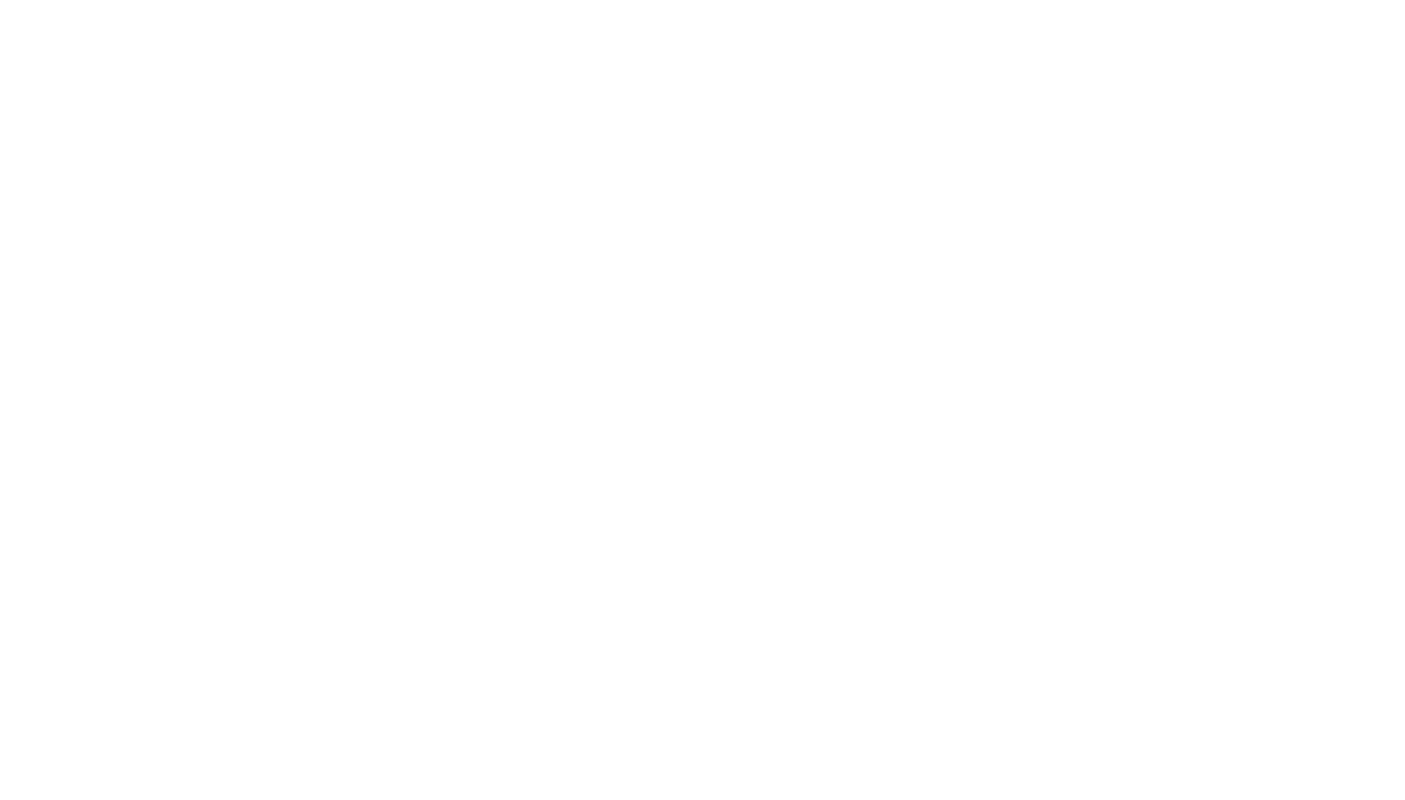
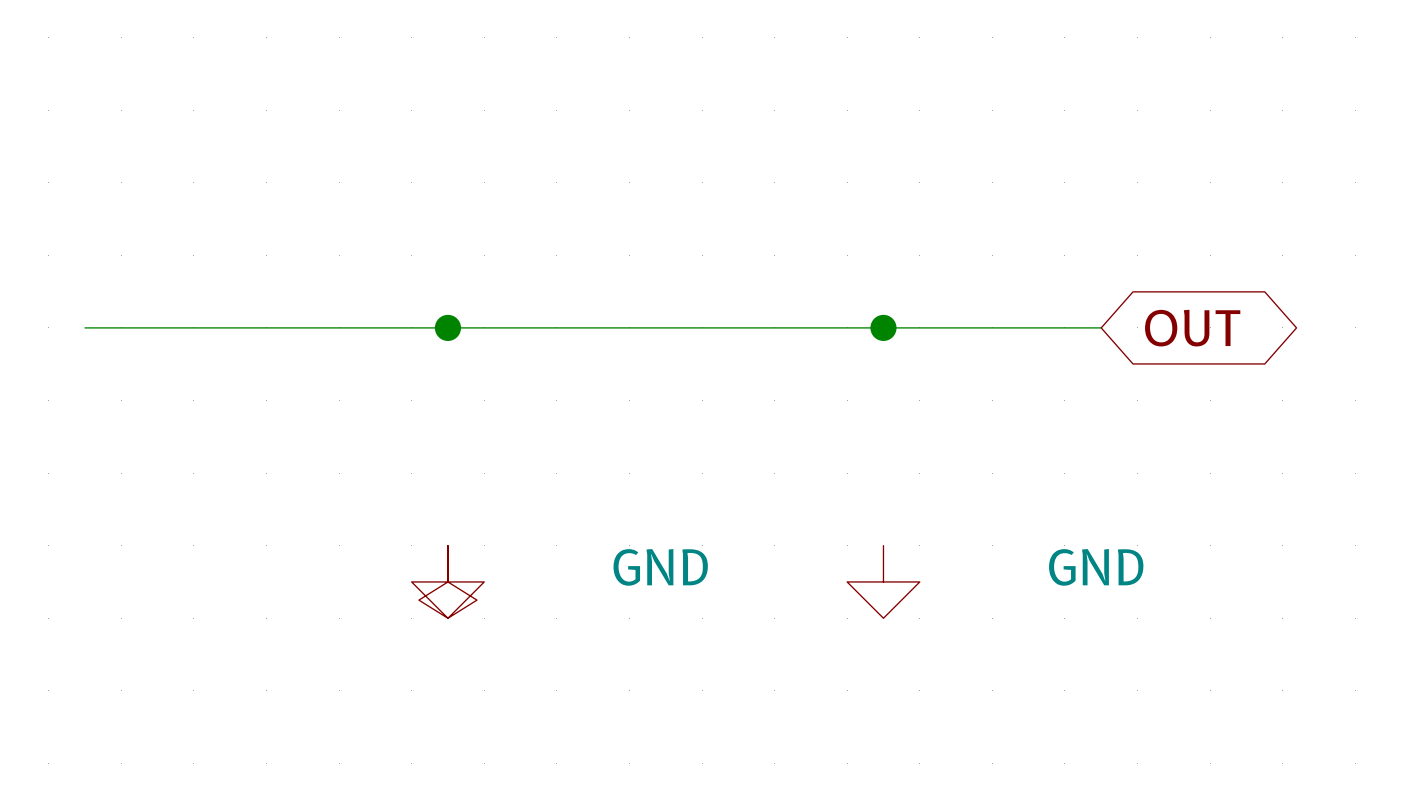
wire: none -> (85, 327) (1101, 327)
junction: none -> (447, 327)
junction: none -> (883, 327)
global label: none -> OUT (1192, 328)
power symbol: none -> (447, 581)
power symbol: none -> GND (447, 581)
power symbol: none -> GND (883, 581)

